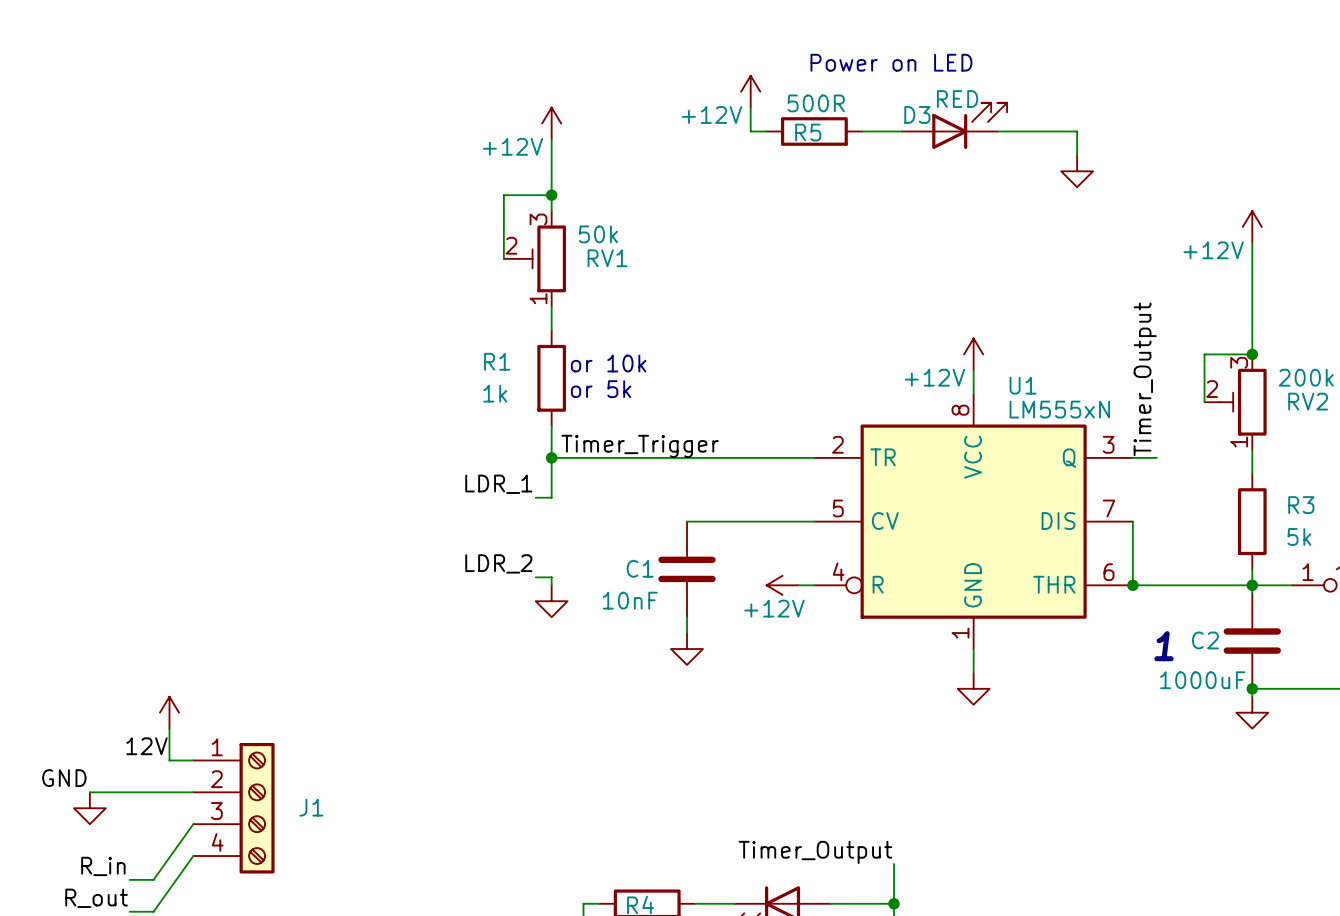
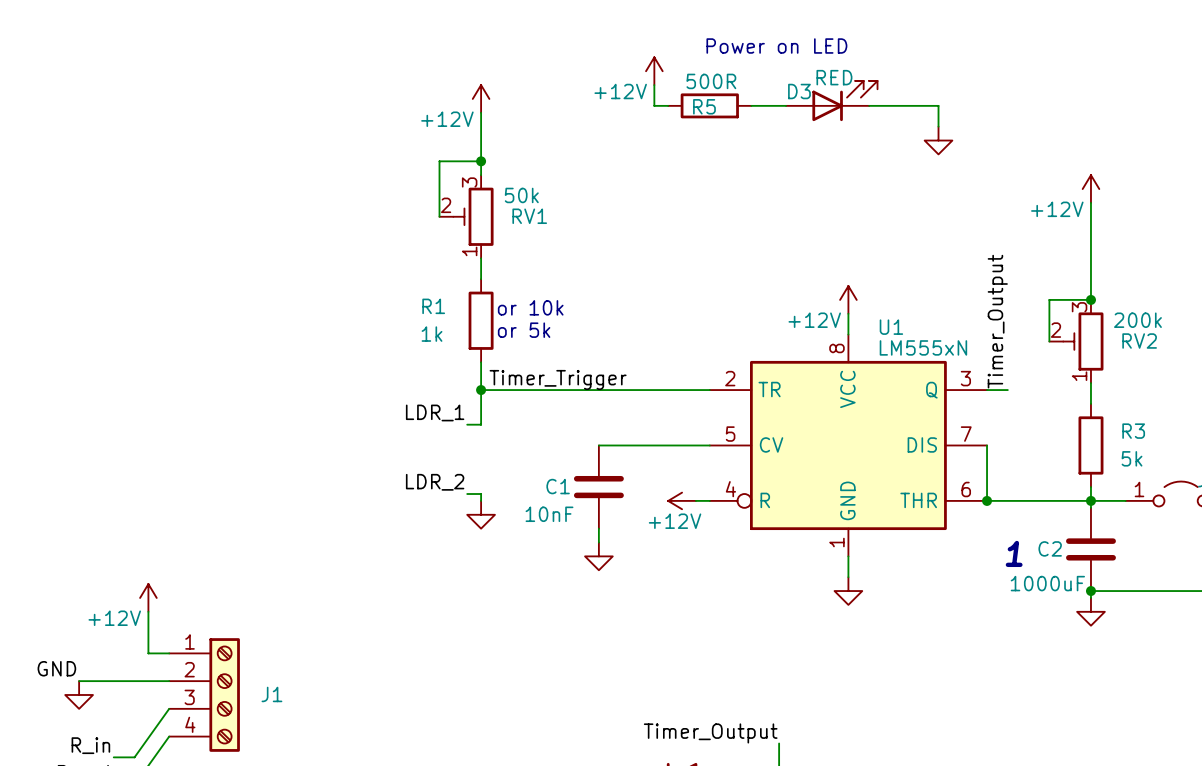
power symbol: none -> +12V (148, 597)
power symbol: (169, 712) -> none
label: 12V (147, 746) -> none

